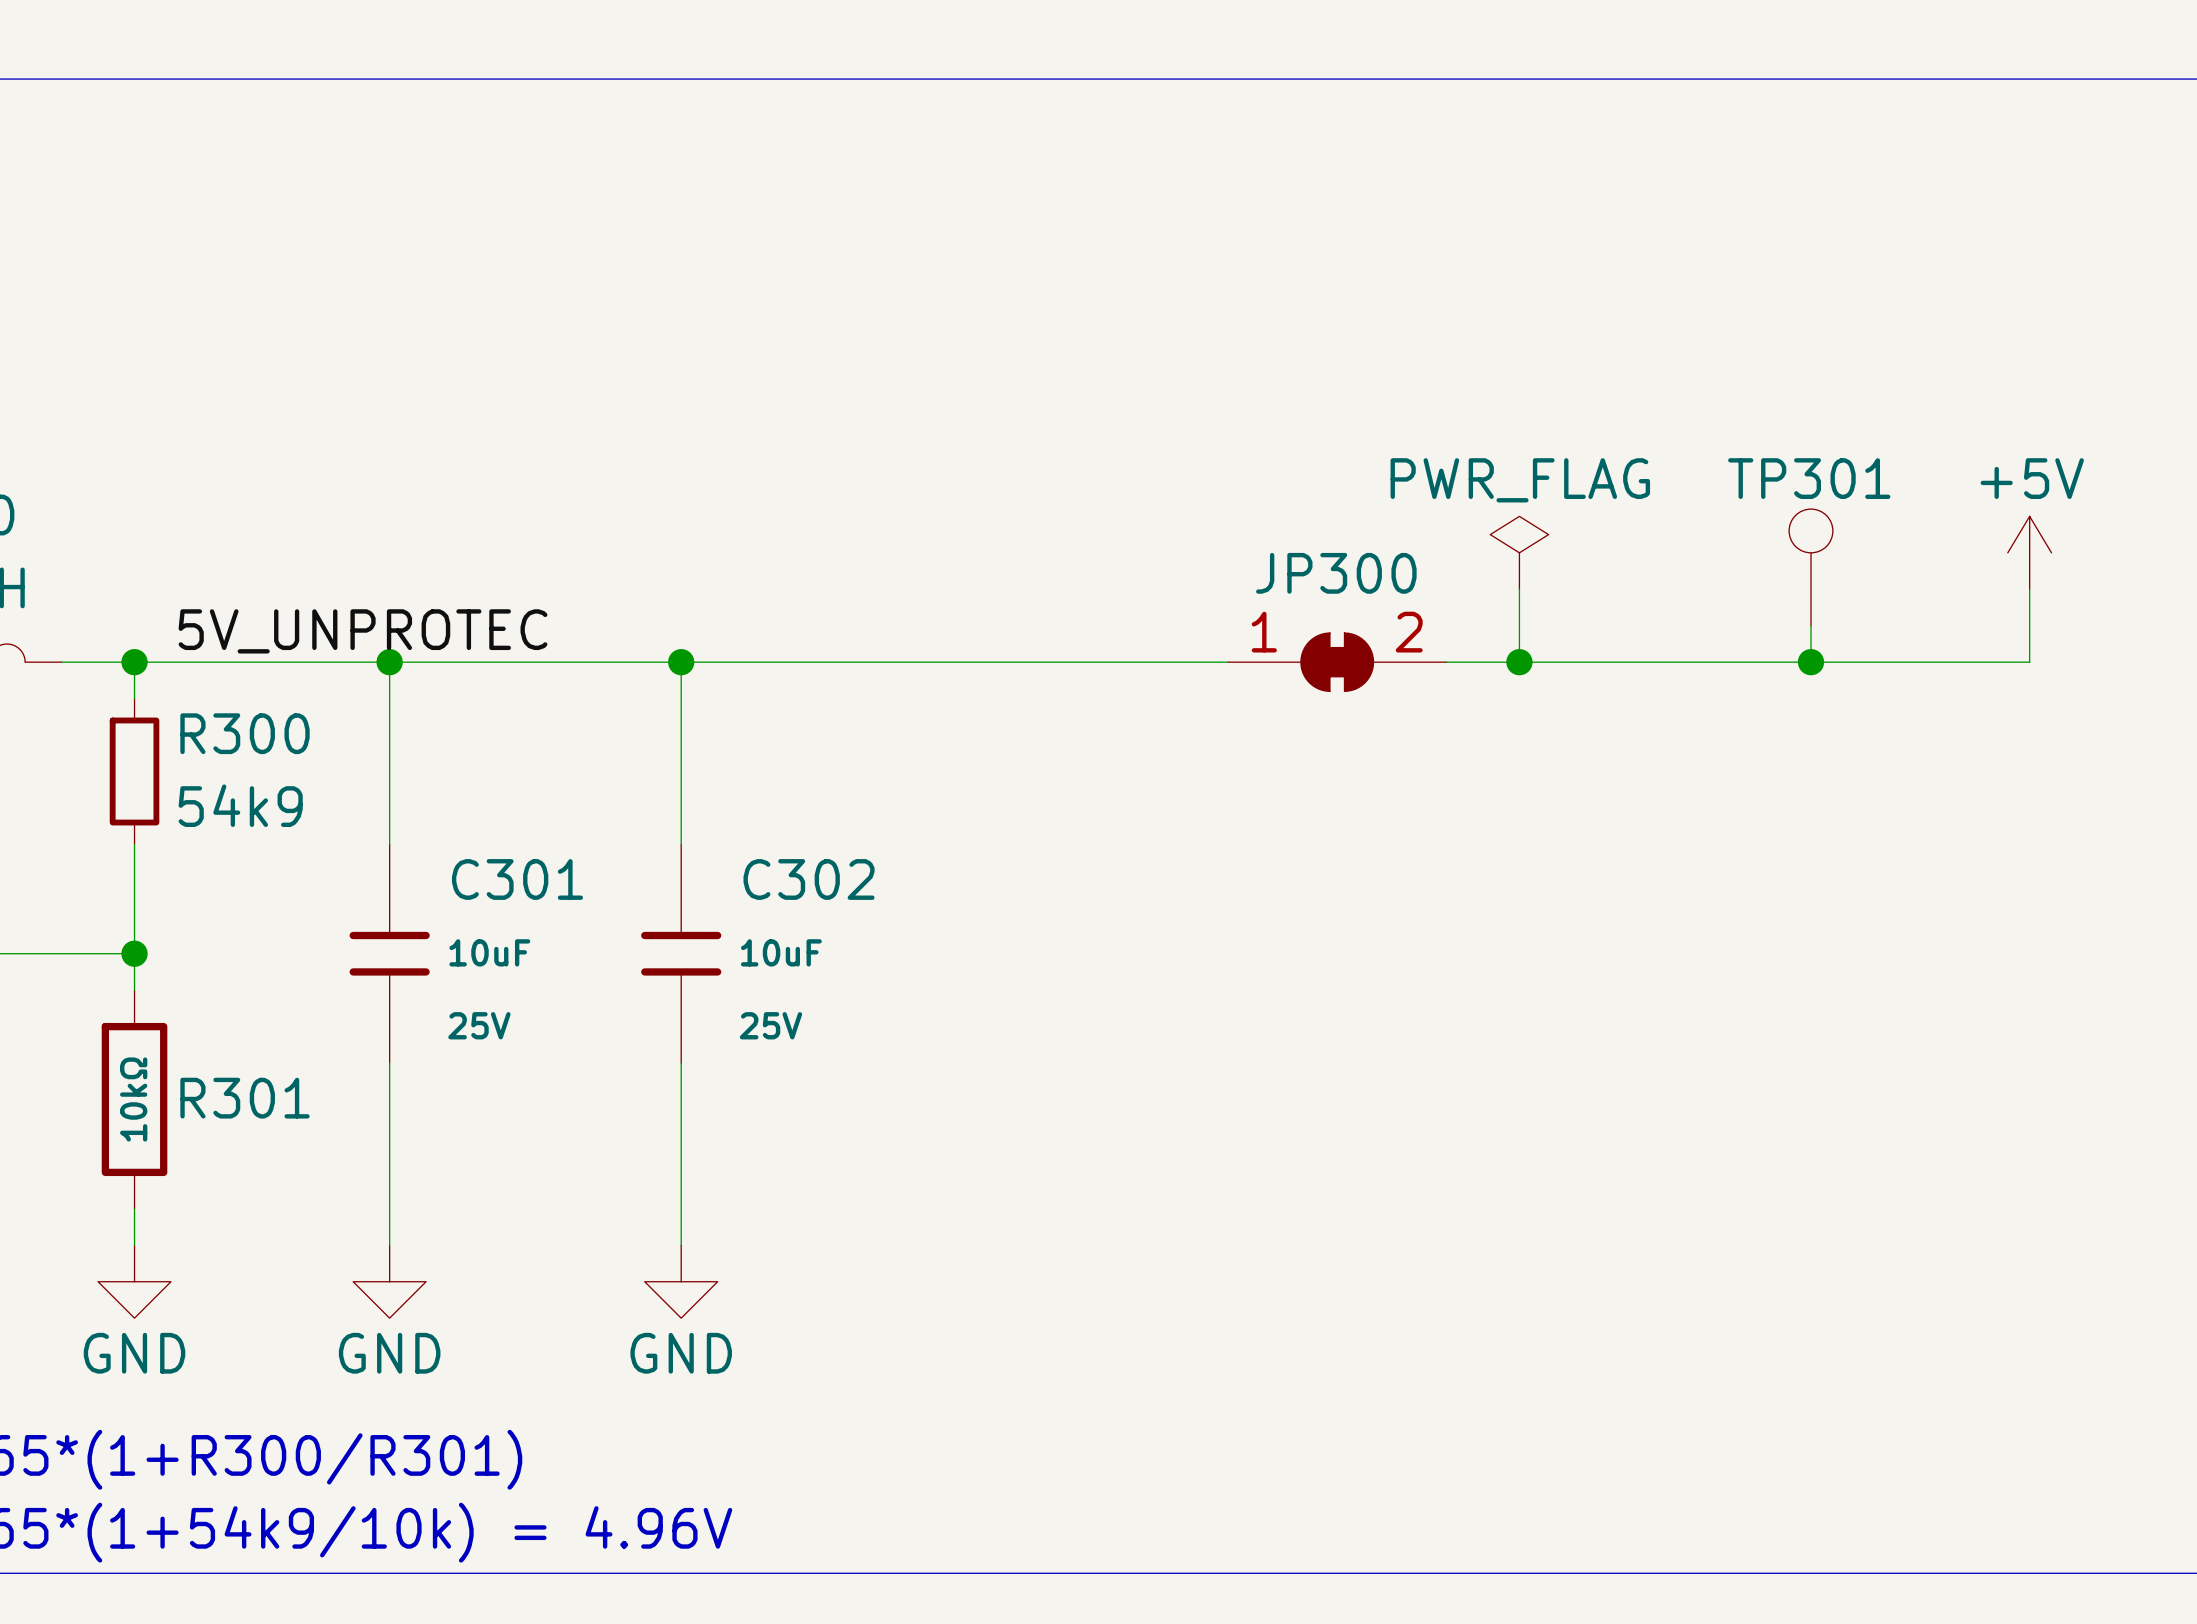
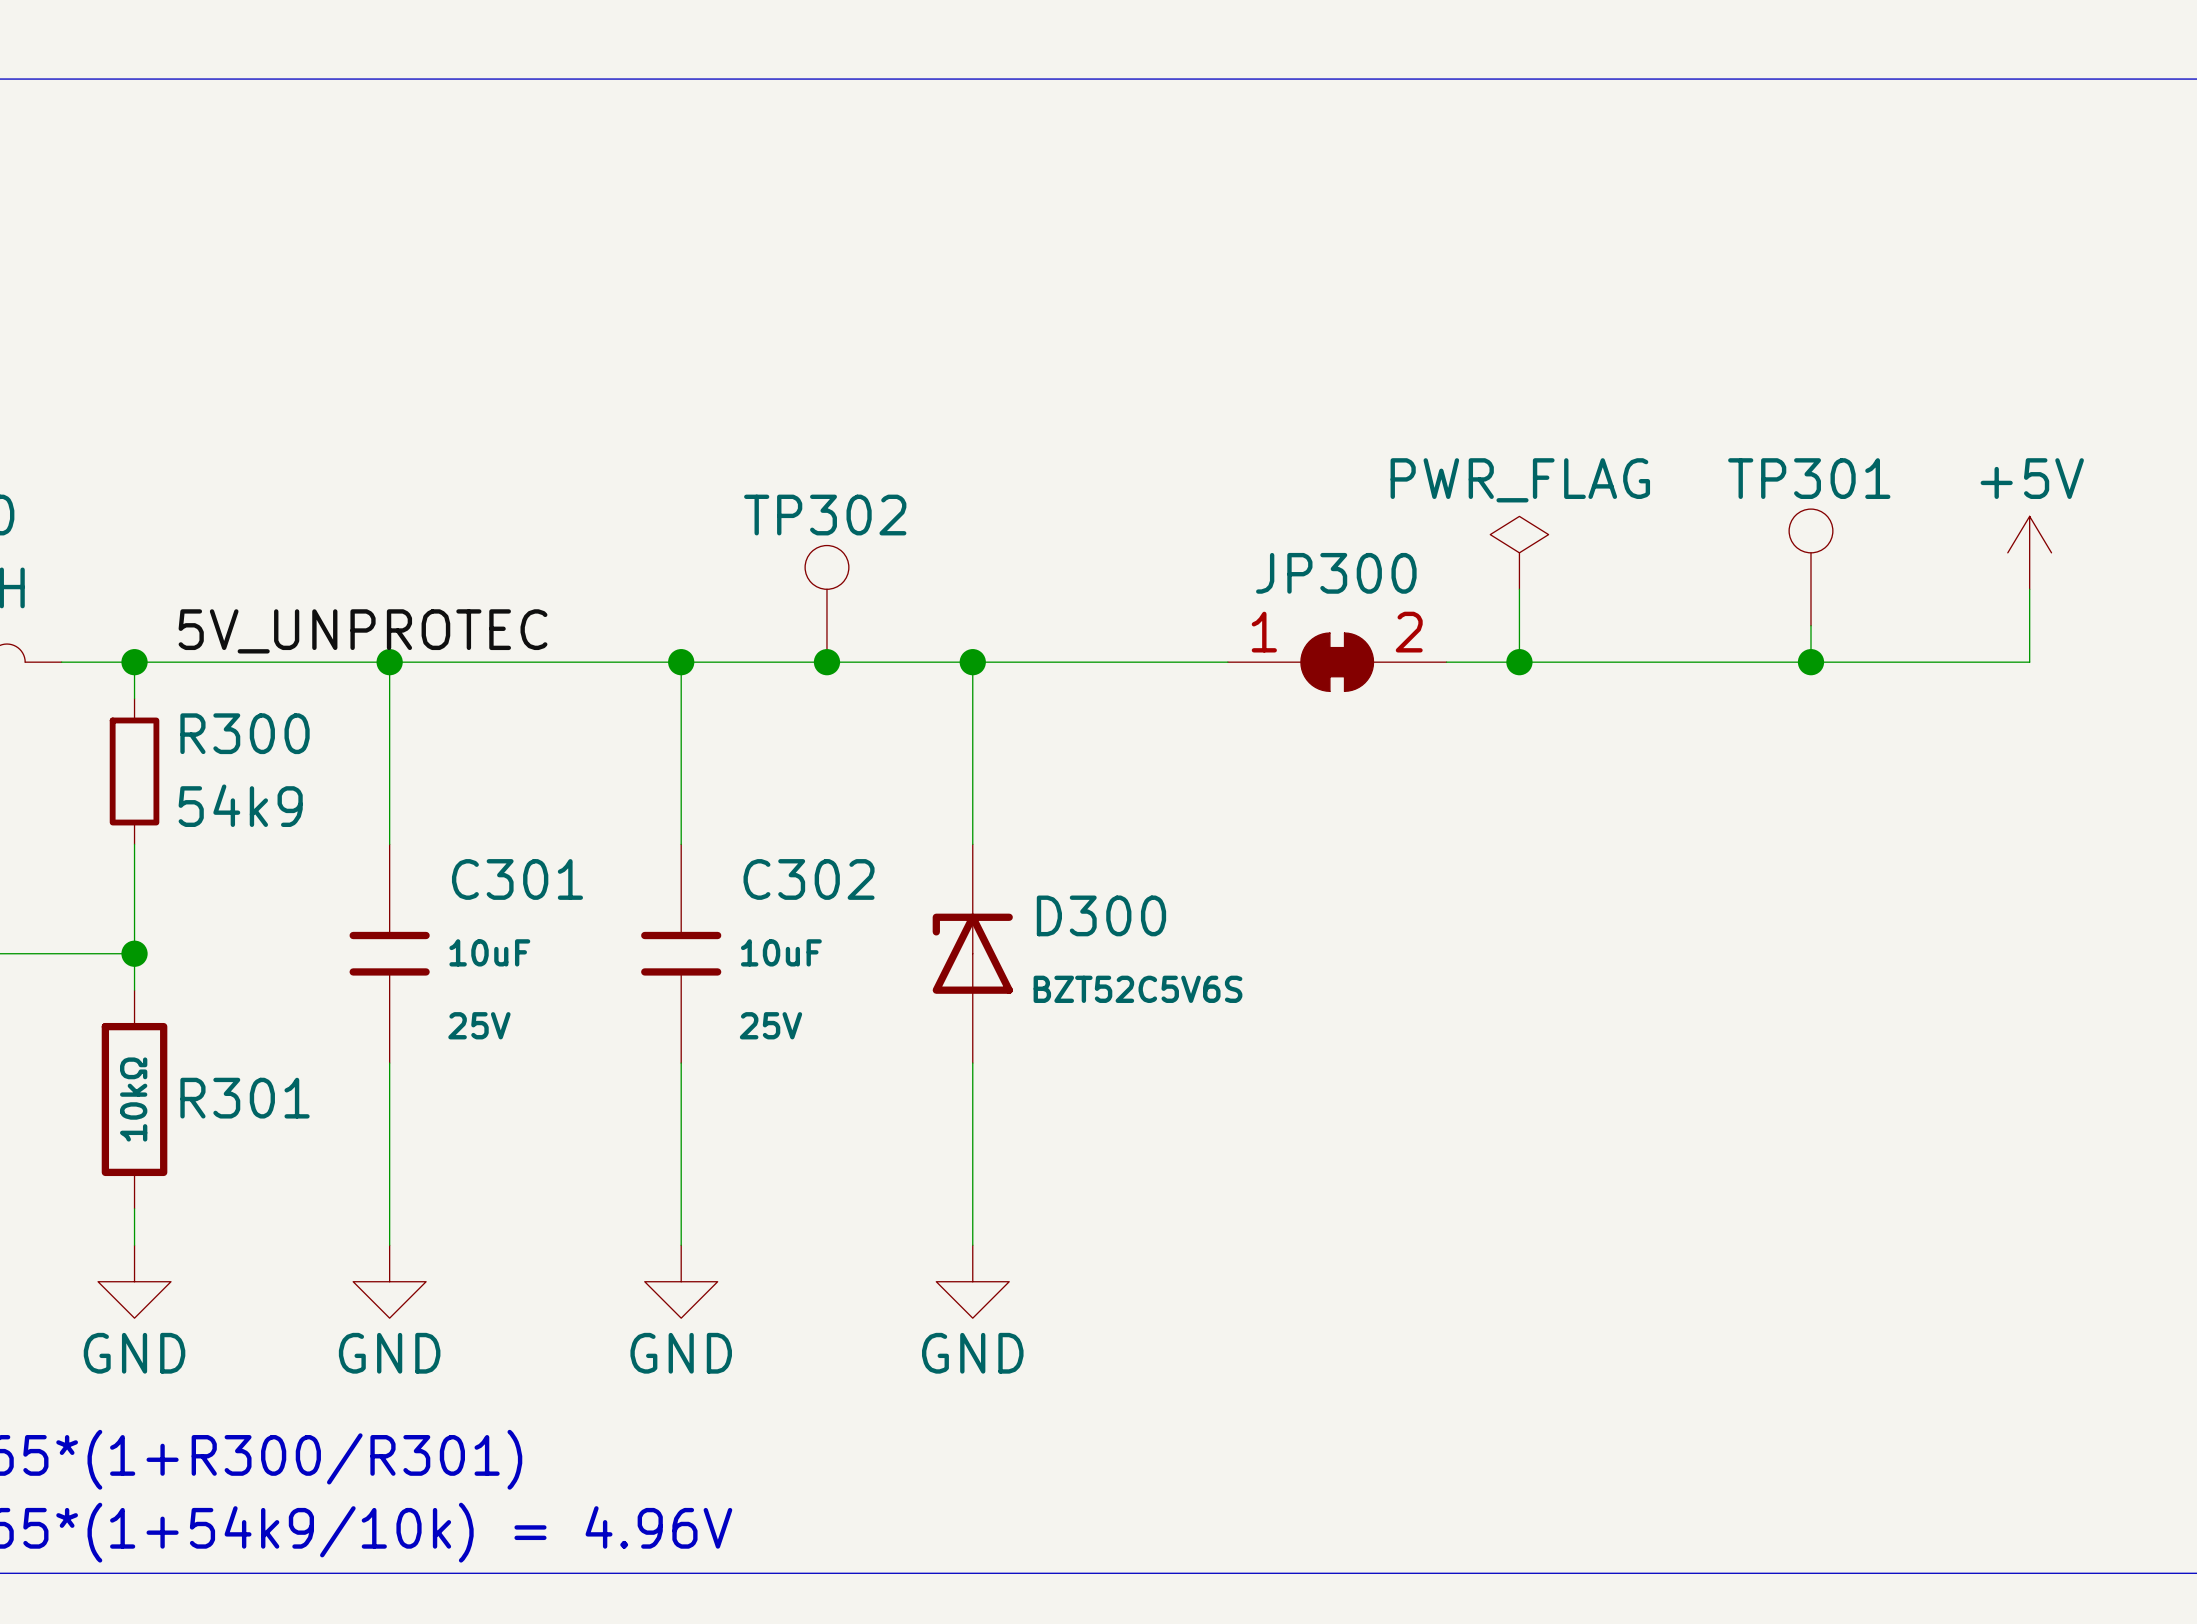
TP302: none -> (826, 603)
junction: none -> (826, 662)
wire: none -> (972, 662) (972, 844)
junction: none -> (972, 662)
D300: none -> BZT52C5V6S (972, 953)
wire: none -> (972, 1063) (972, 1245)
power symbol: none -> GND (972, 1281)

